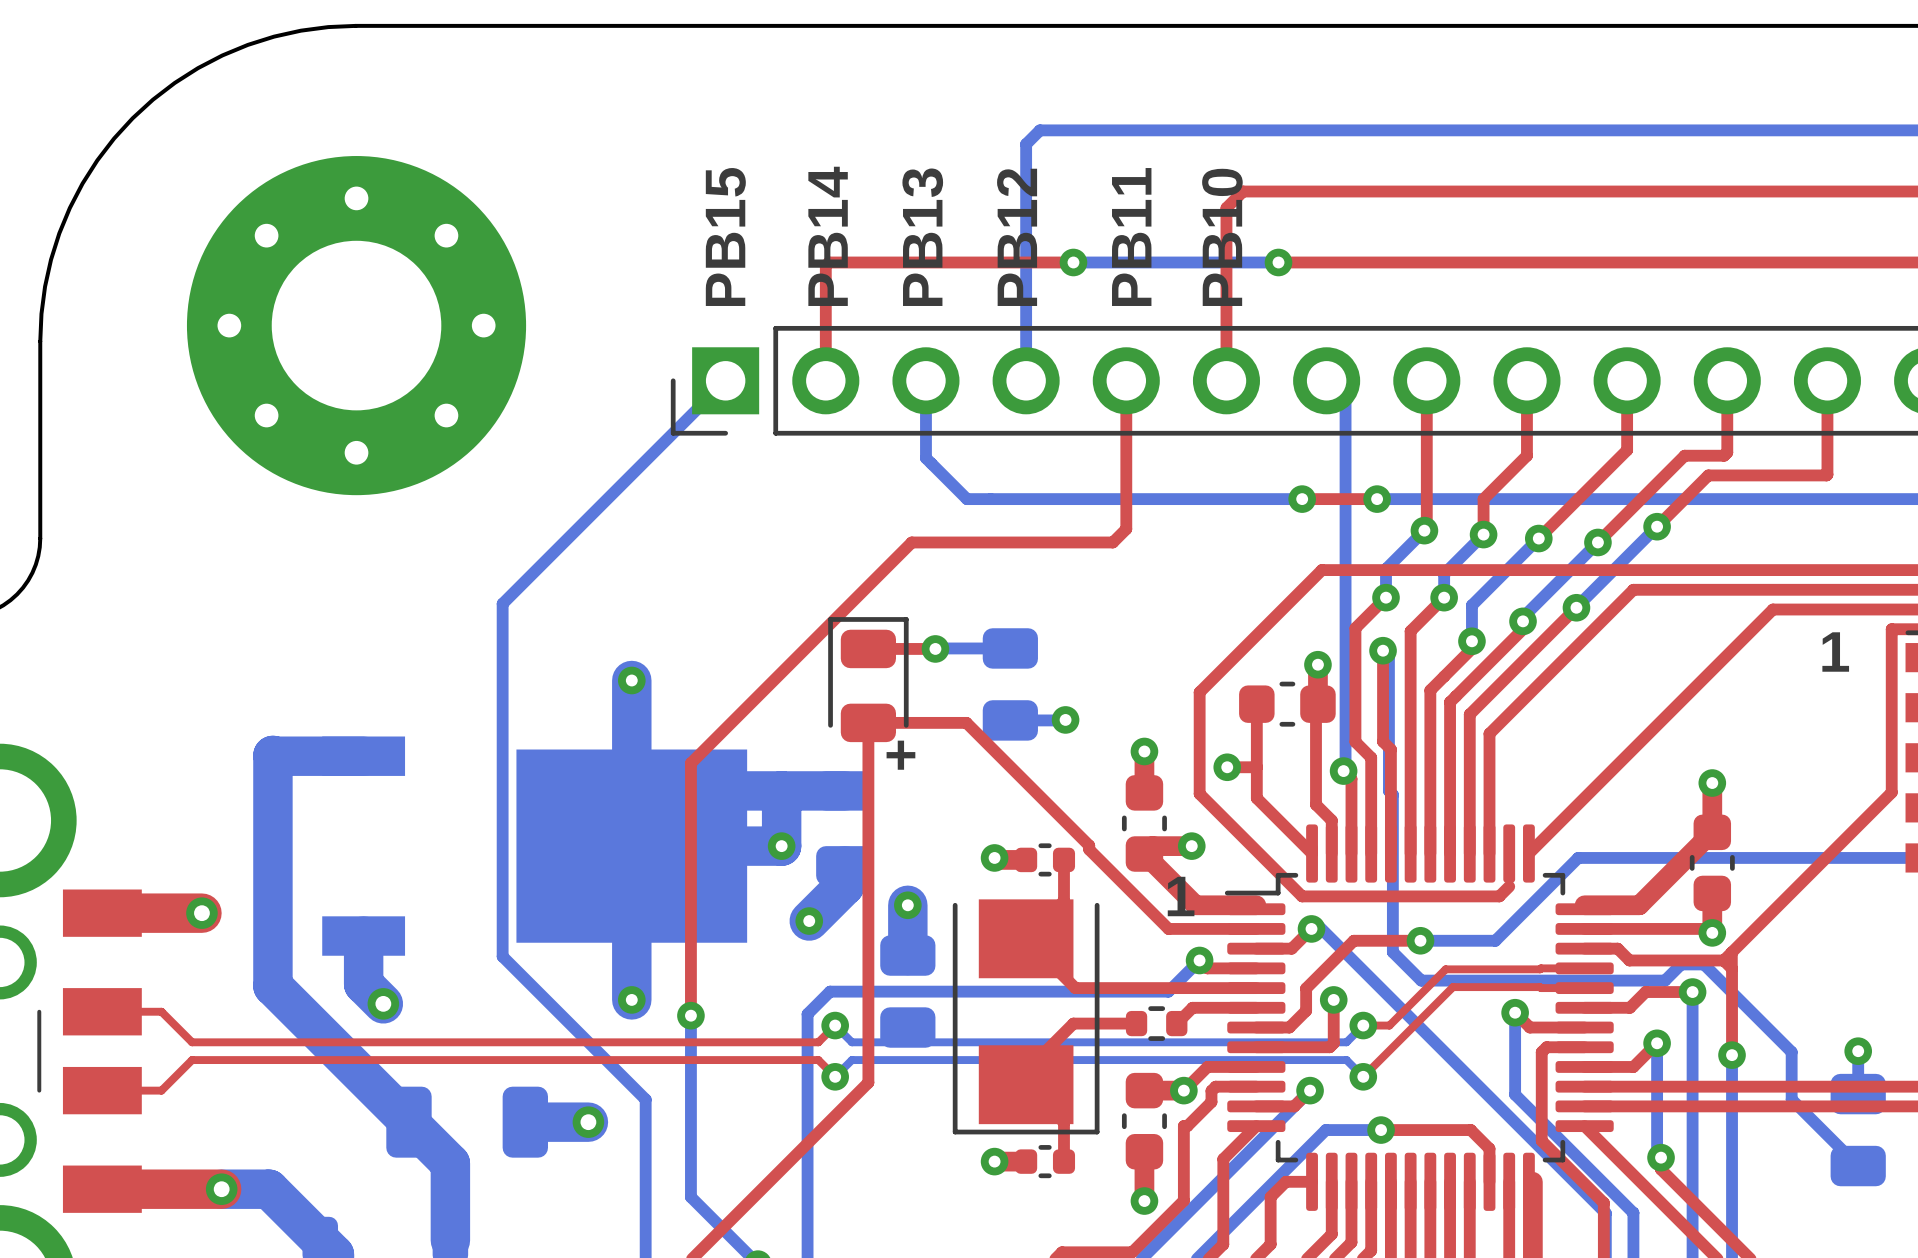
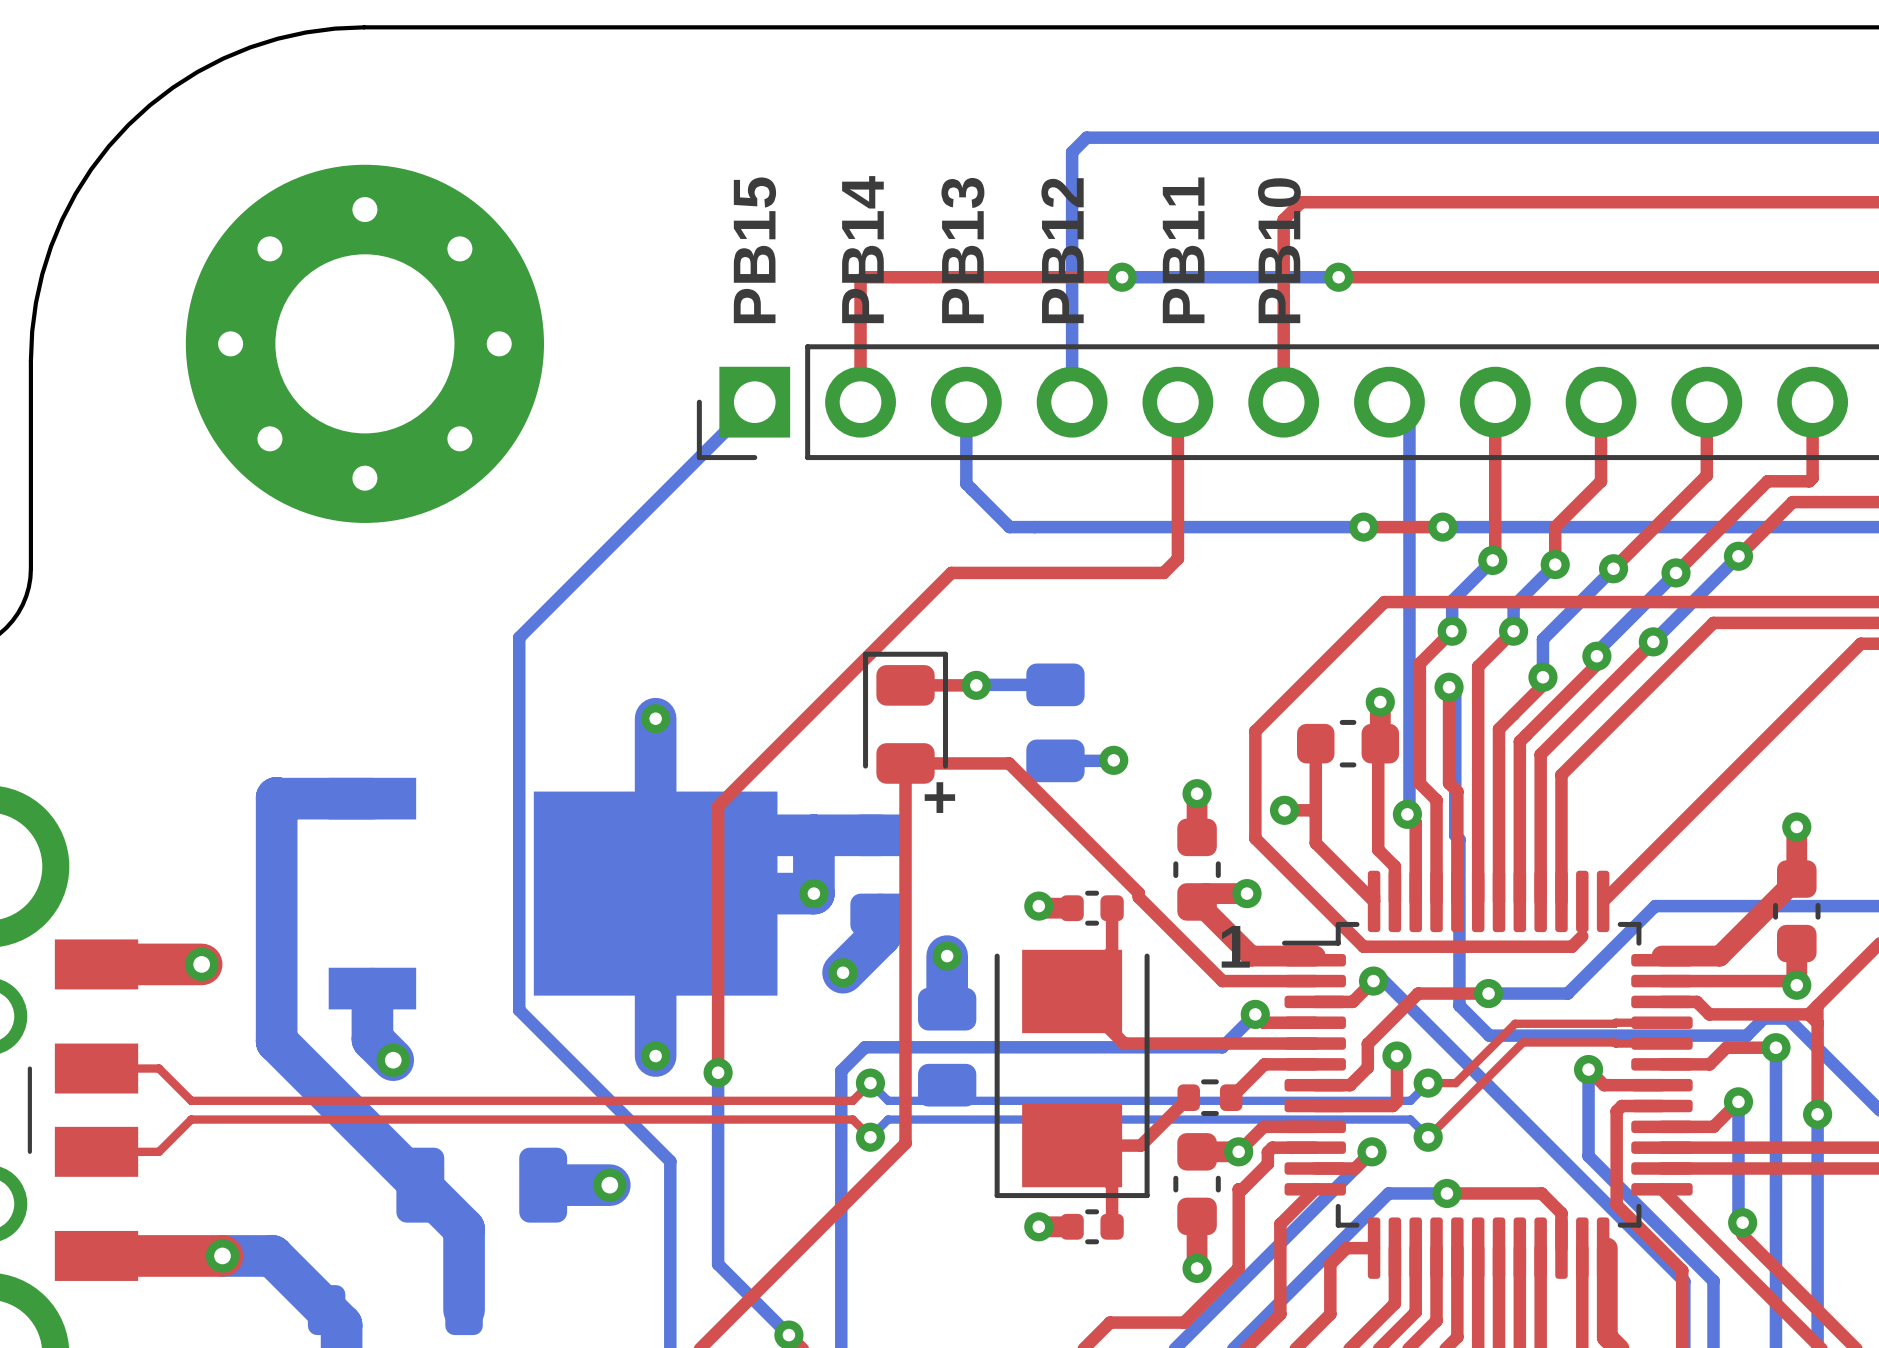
top track: (1208, 1007) (1192, 1007) (1176, 1023) -> (1264, 1064) (1231, 1097)
top track: (1136, 1023) (1073, 1023) (1026, 1070) (1026, 1084) -> (1188, 1097) (1140, 1145) (1072, 1145)
part position: (1156, 1023) -> (1209, 1097)

